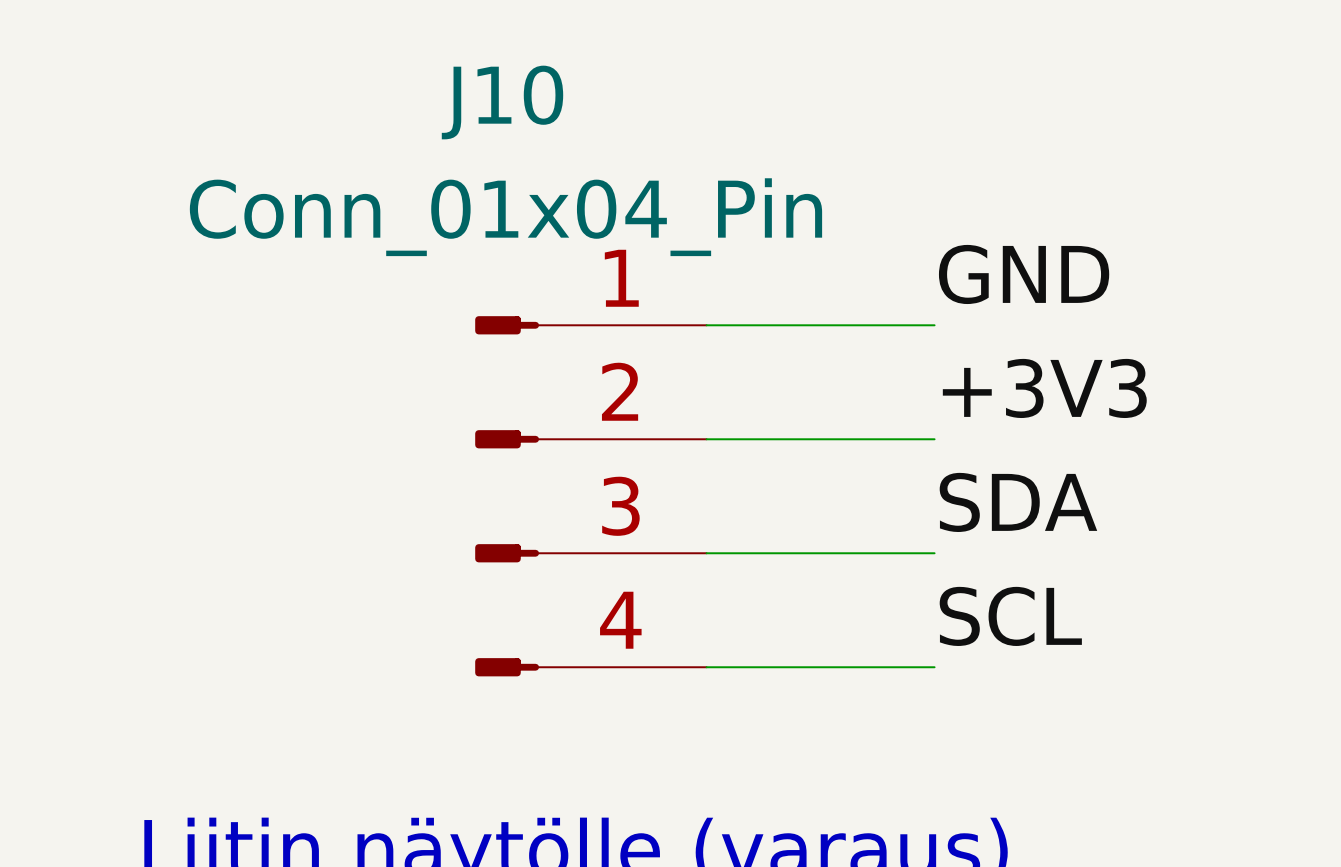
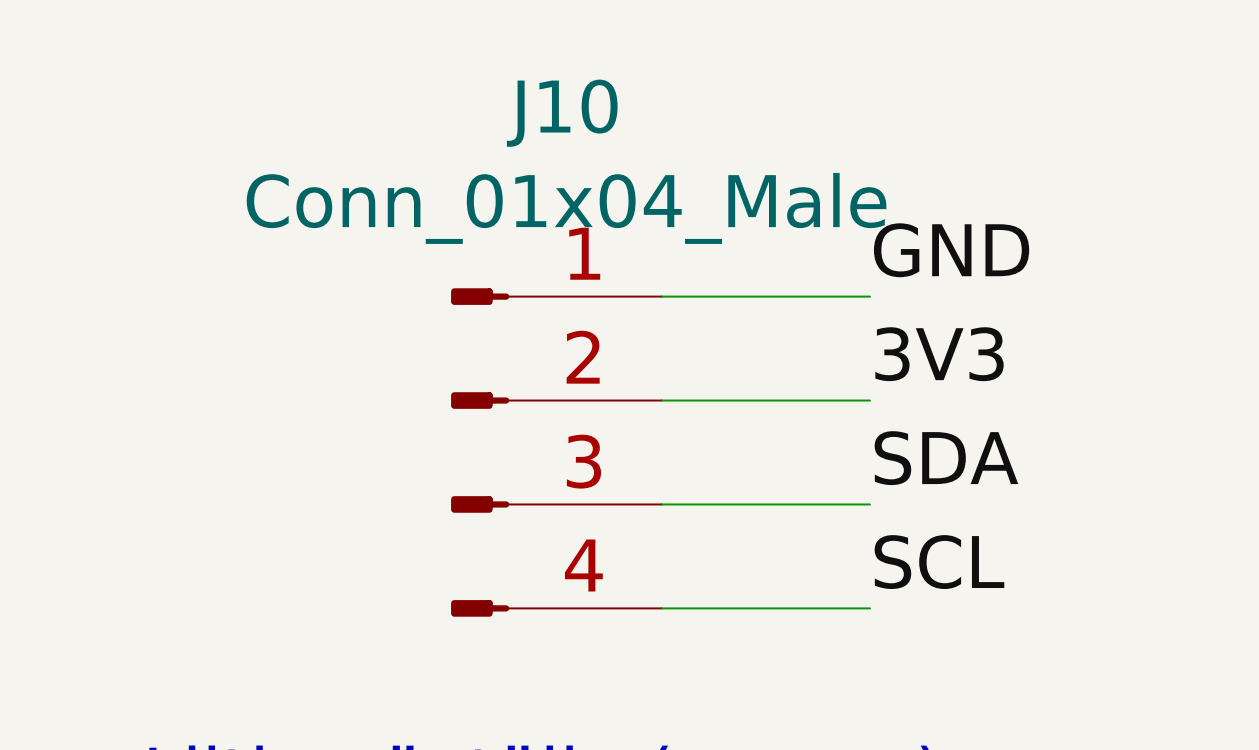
J10 name position: J10 (502, 102) -> J10 (562, 113)
J10 value: Conn_01x04_Pin (505, 217) -> Conn_01x04_Male (566, 208)
label: +3V3 (1044, 388) -> 3V3 (939, 354)

